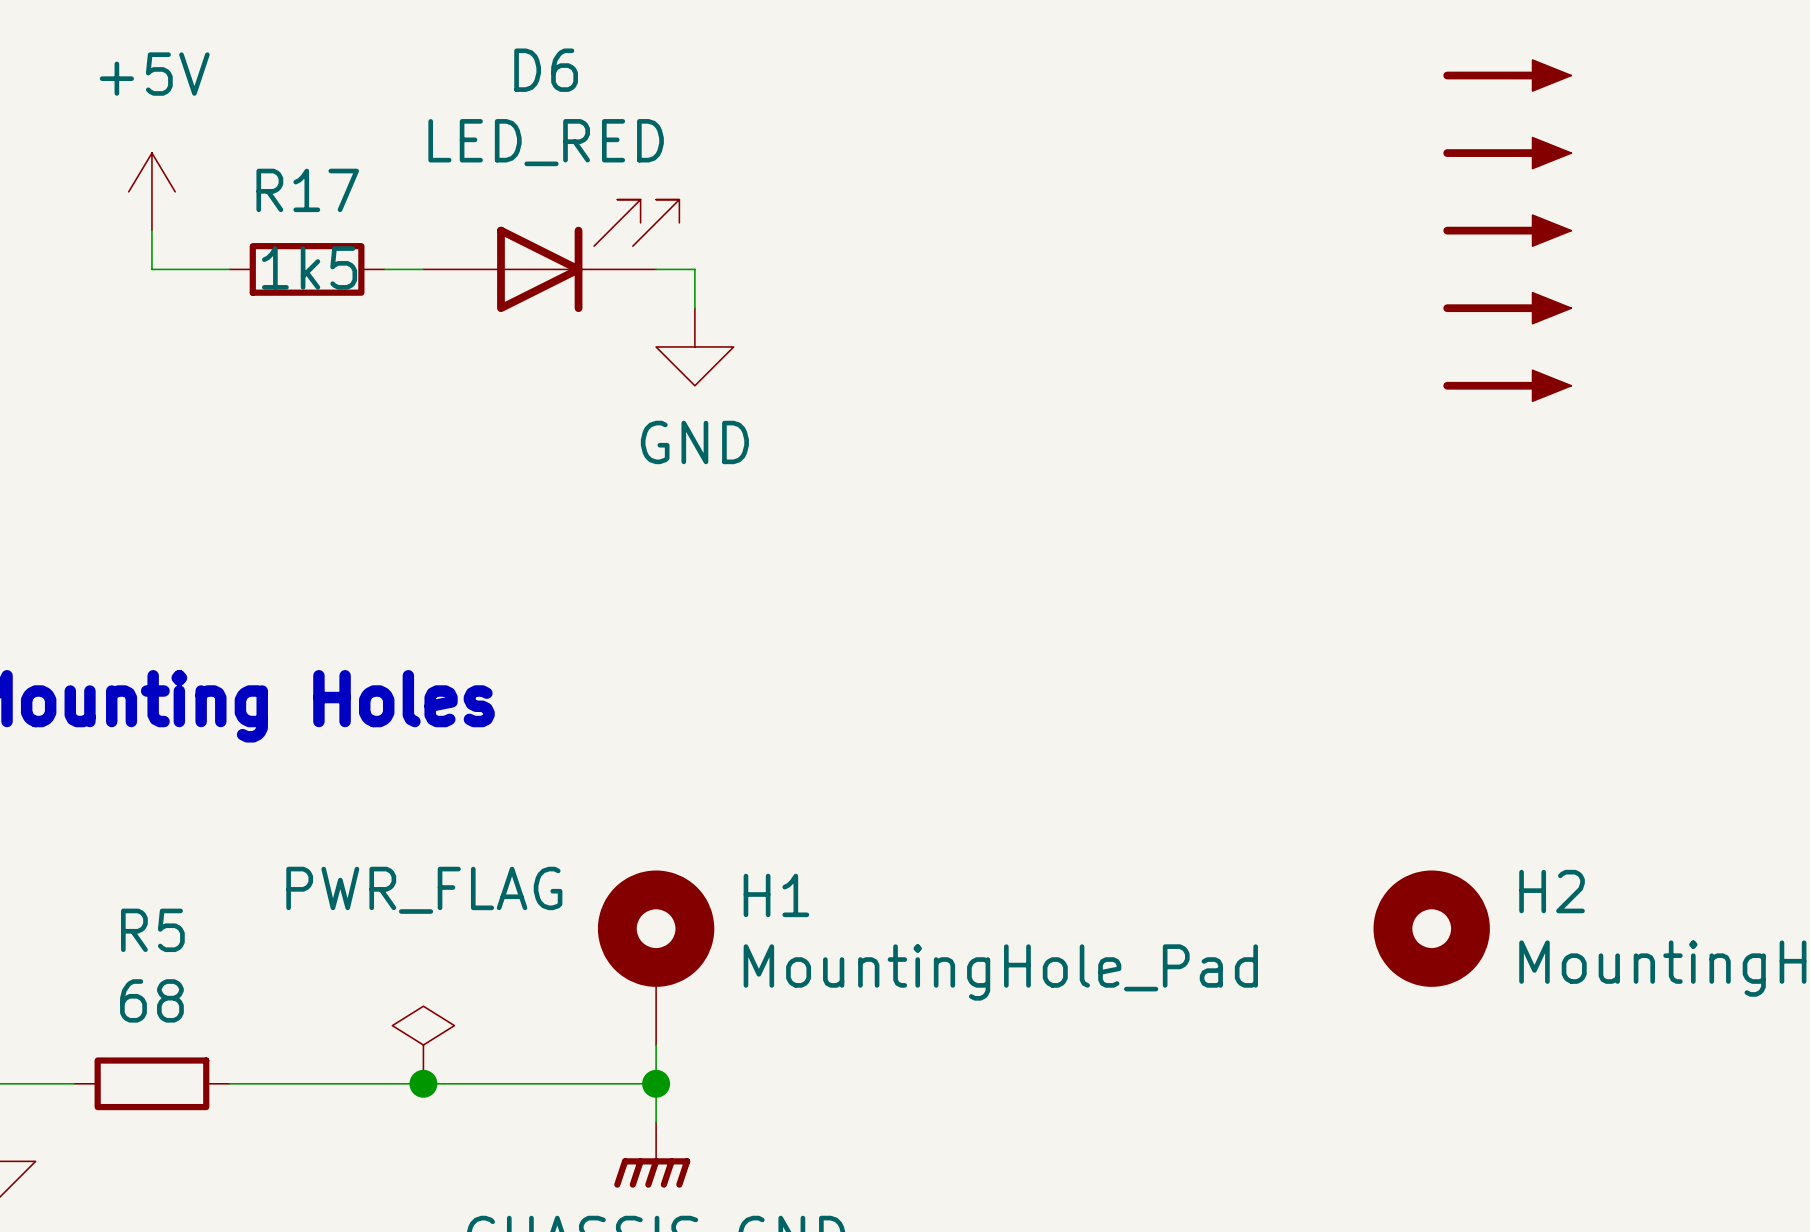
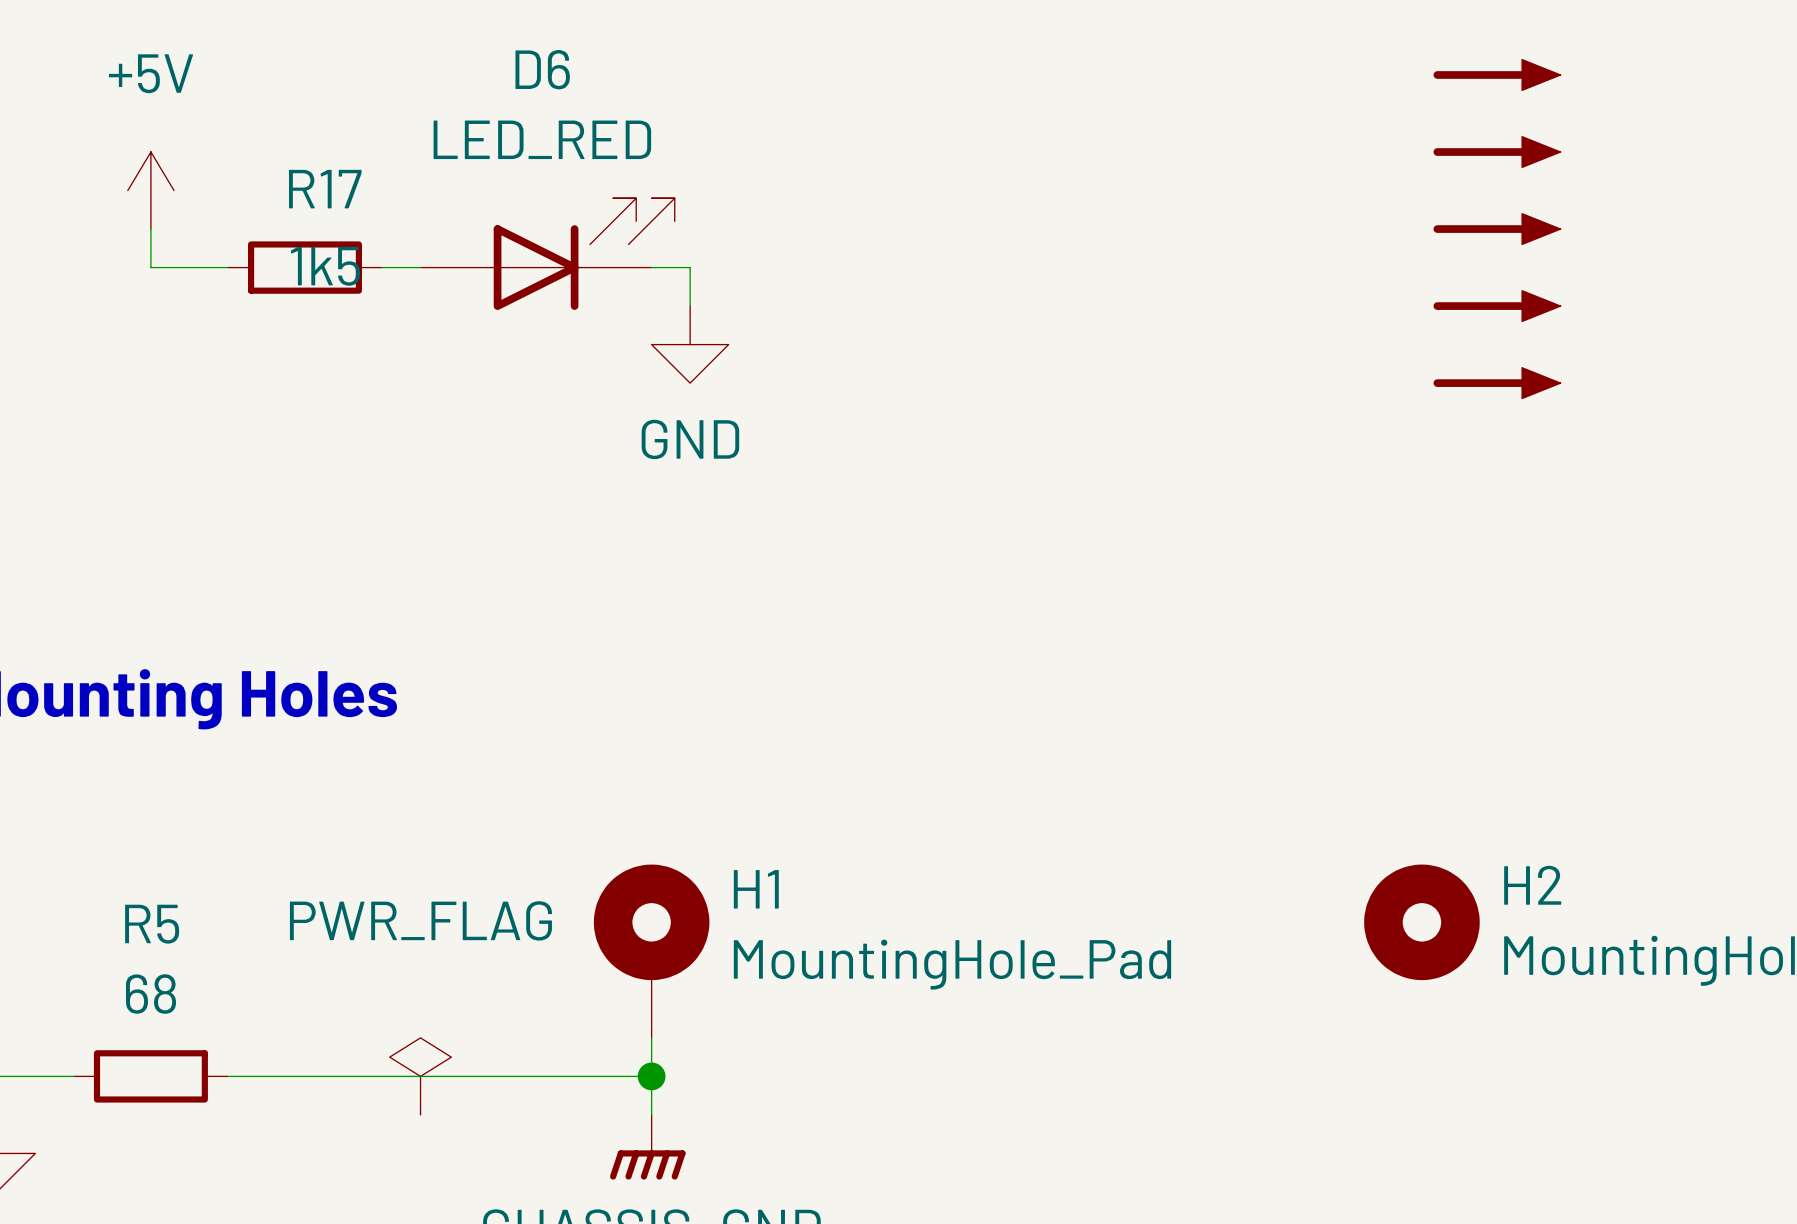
power symbol position: PWR_FLAG (423, 1045) -> PWR_FLAG (420, 1076)
junction: (423, 1083) -> none

